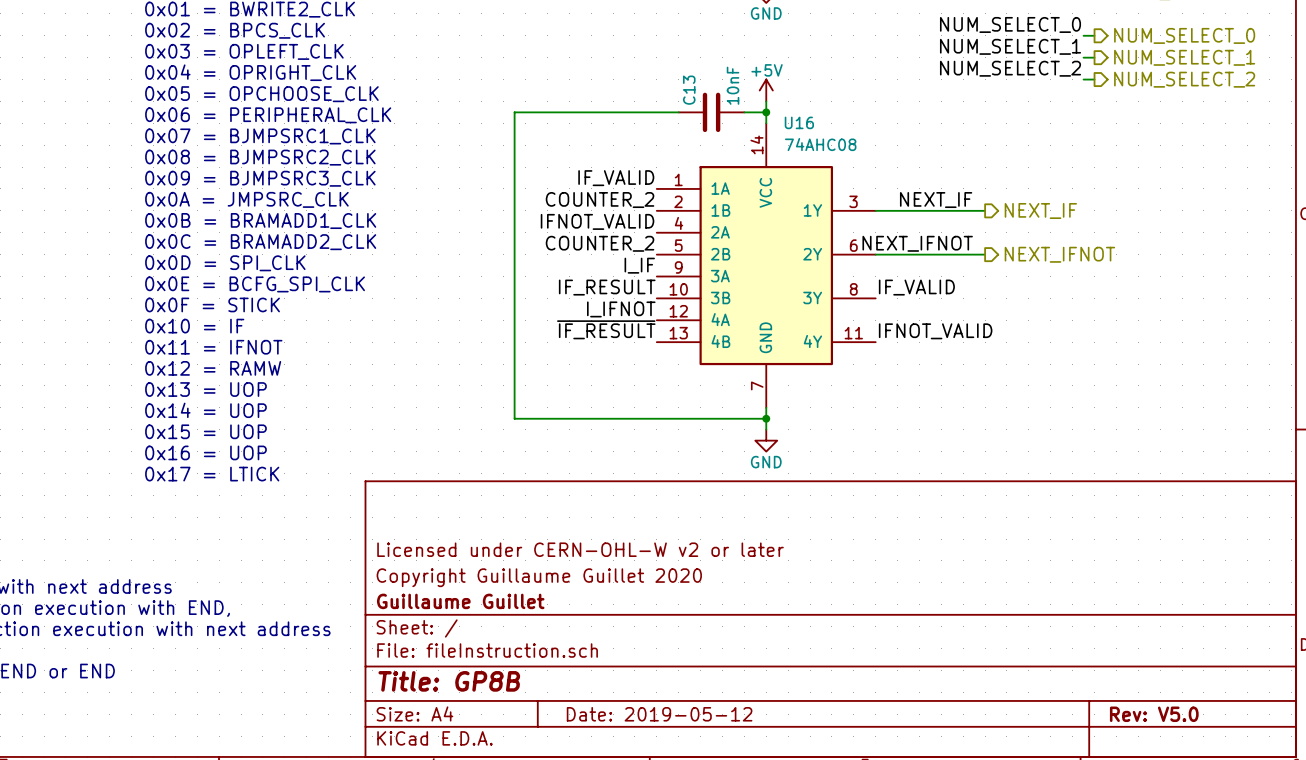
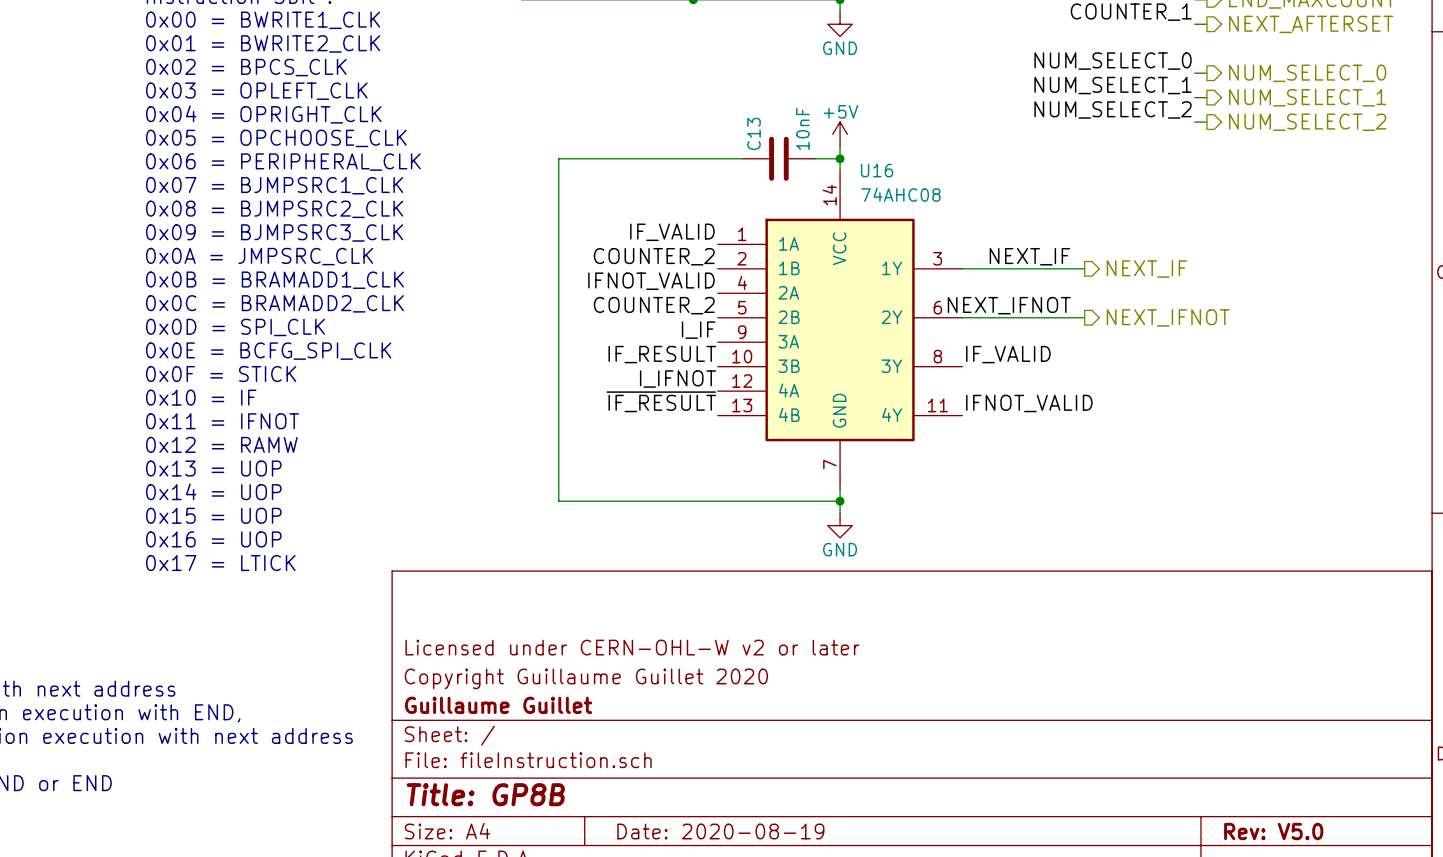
title block: Date: 2019-05-12 (659, 714) -> Date: 2020-08-19 (720, 831)

